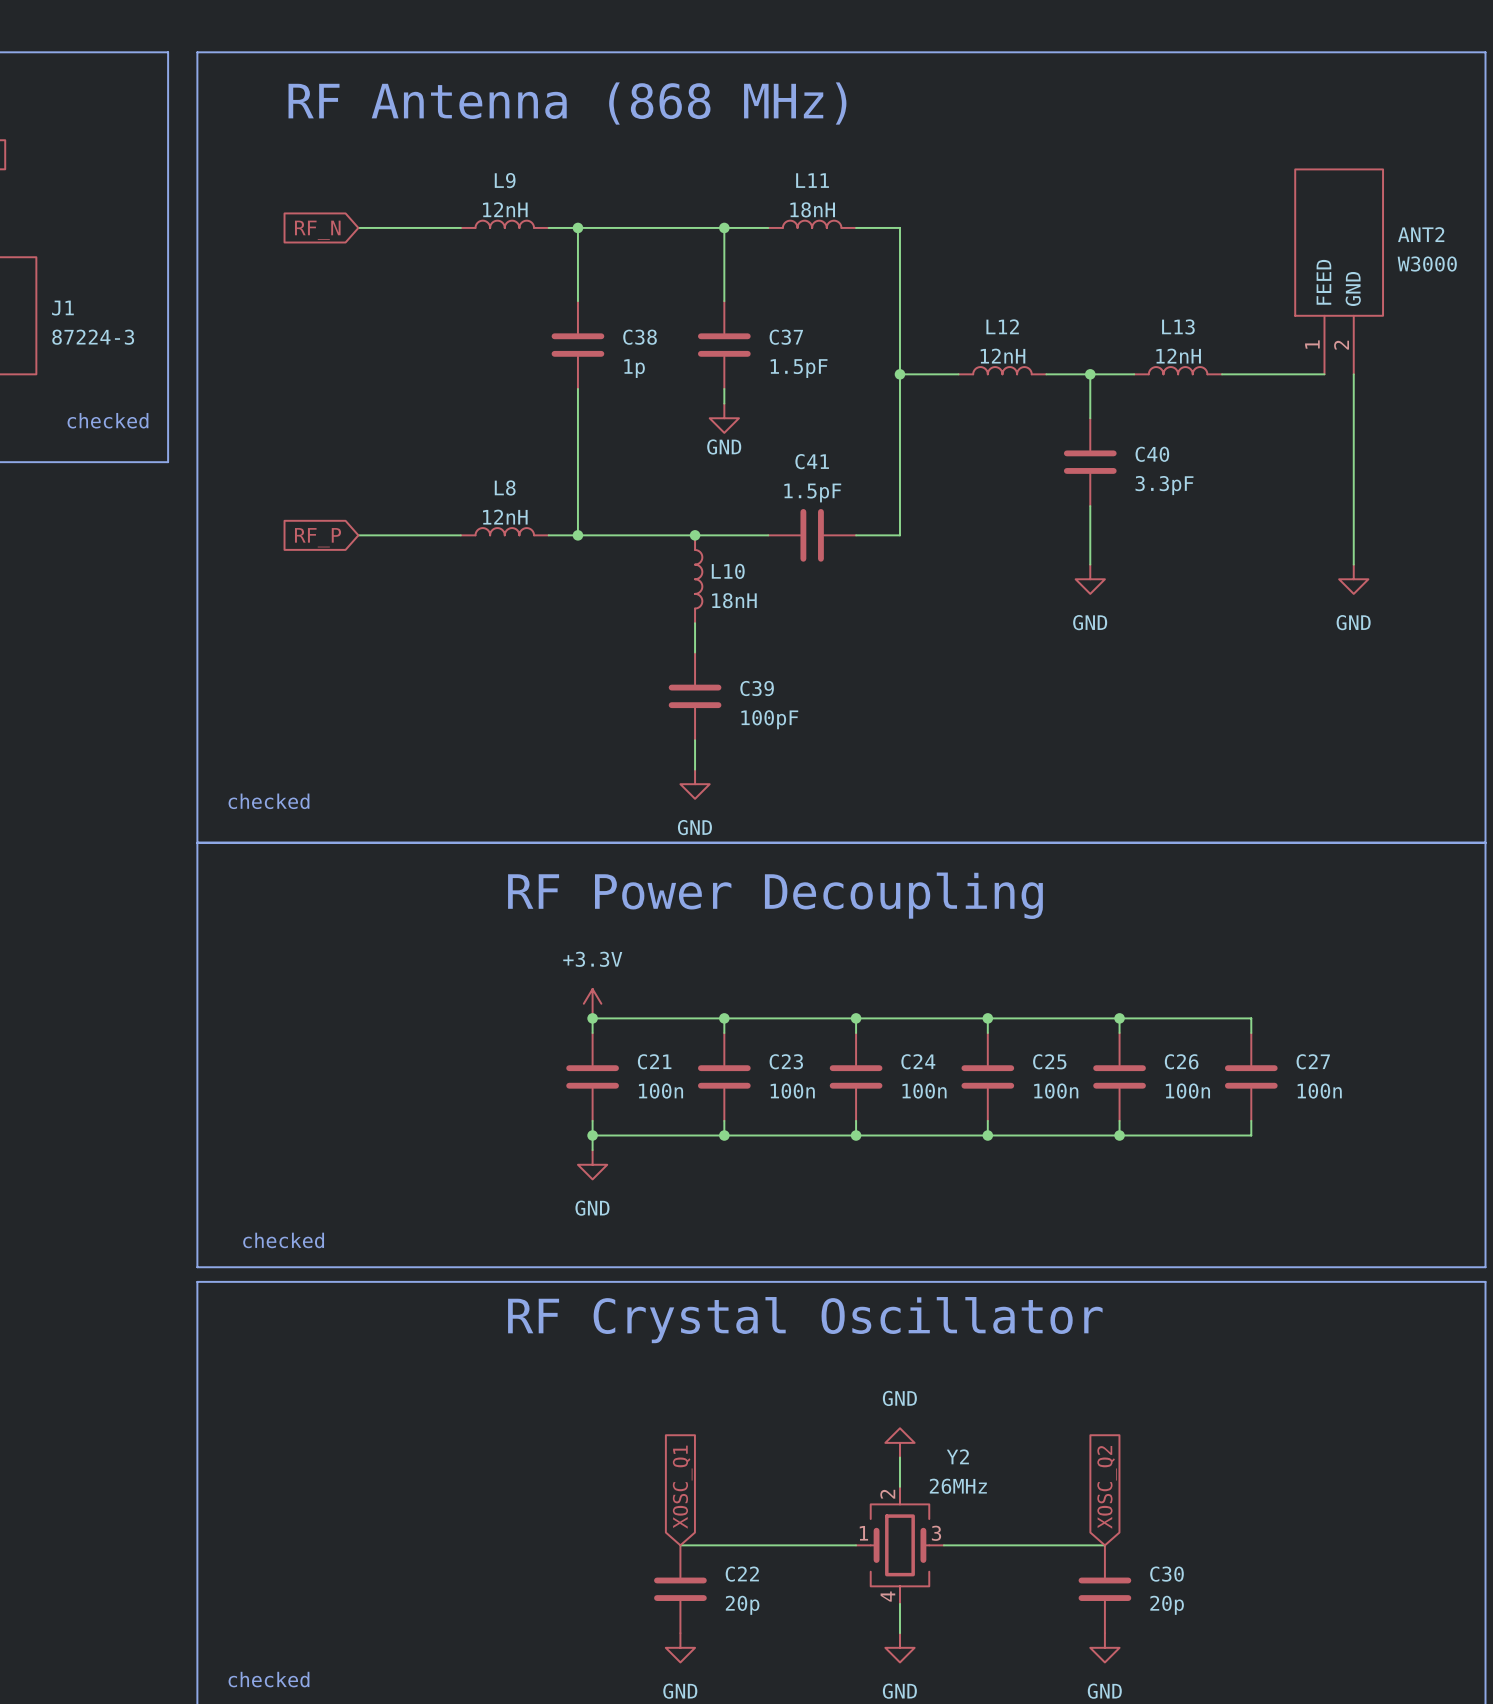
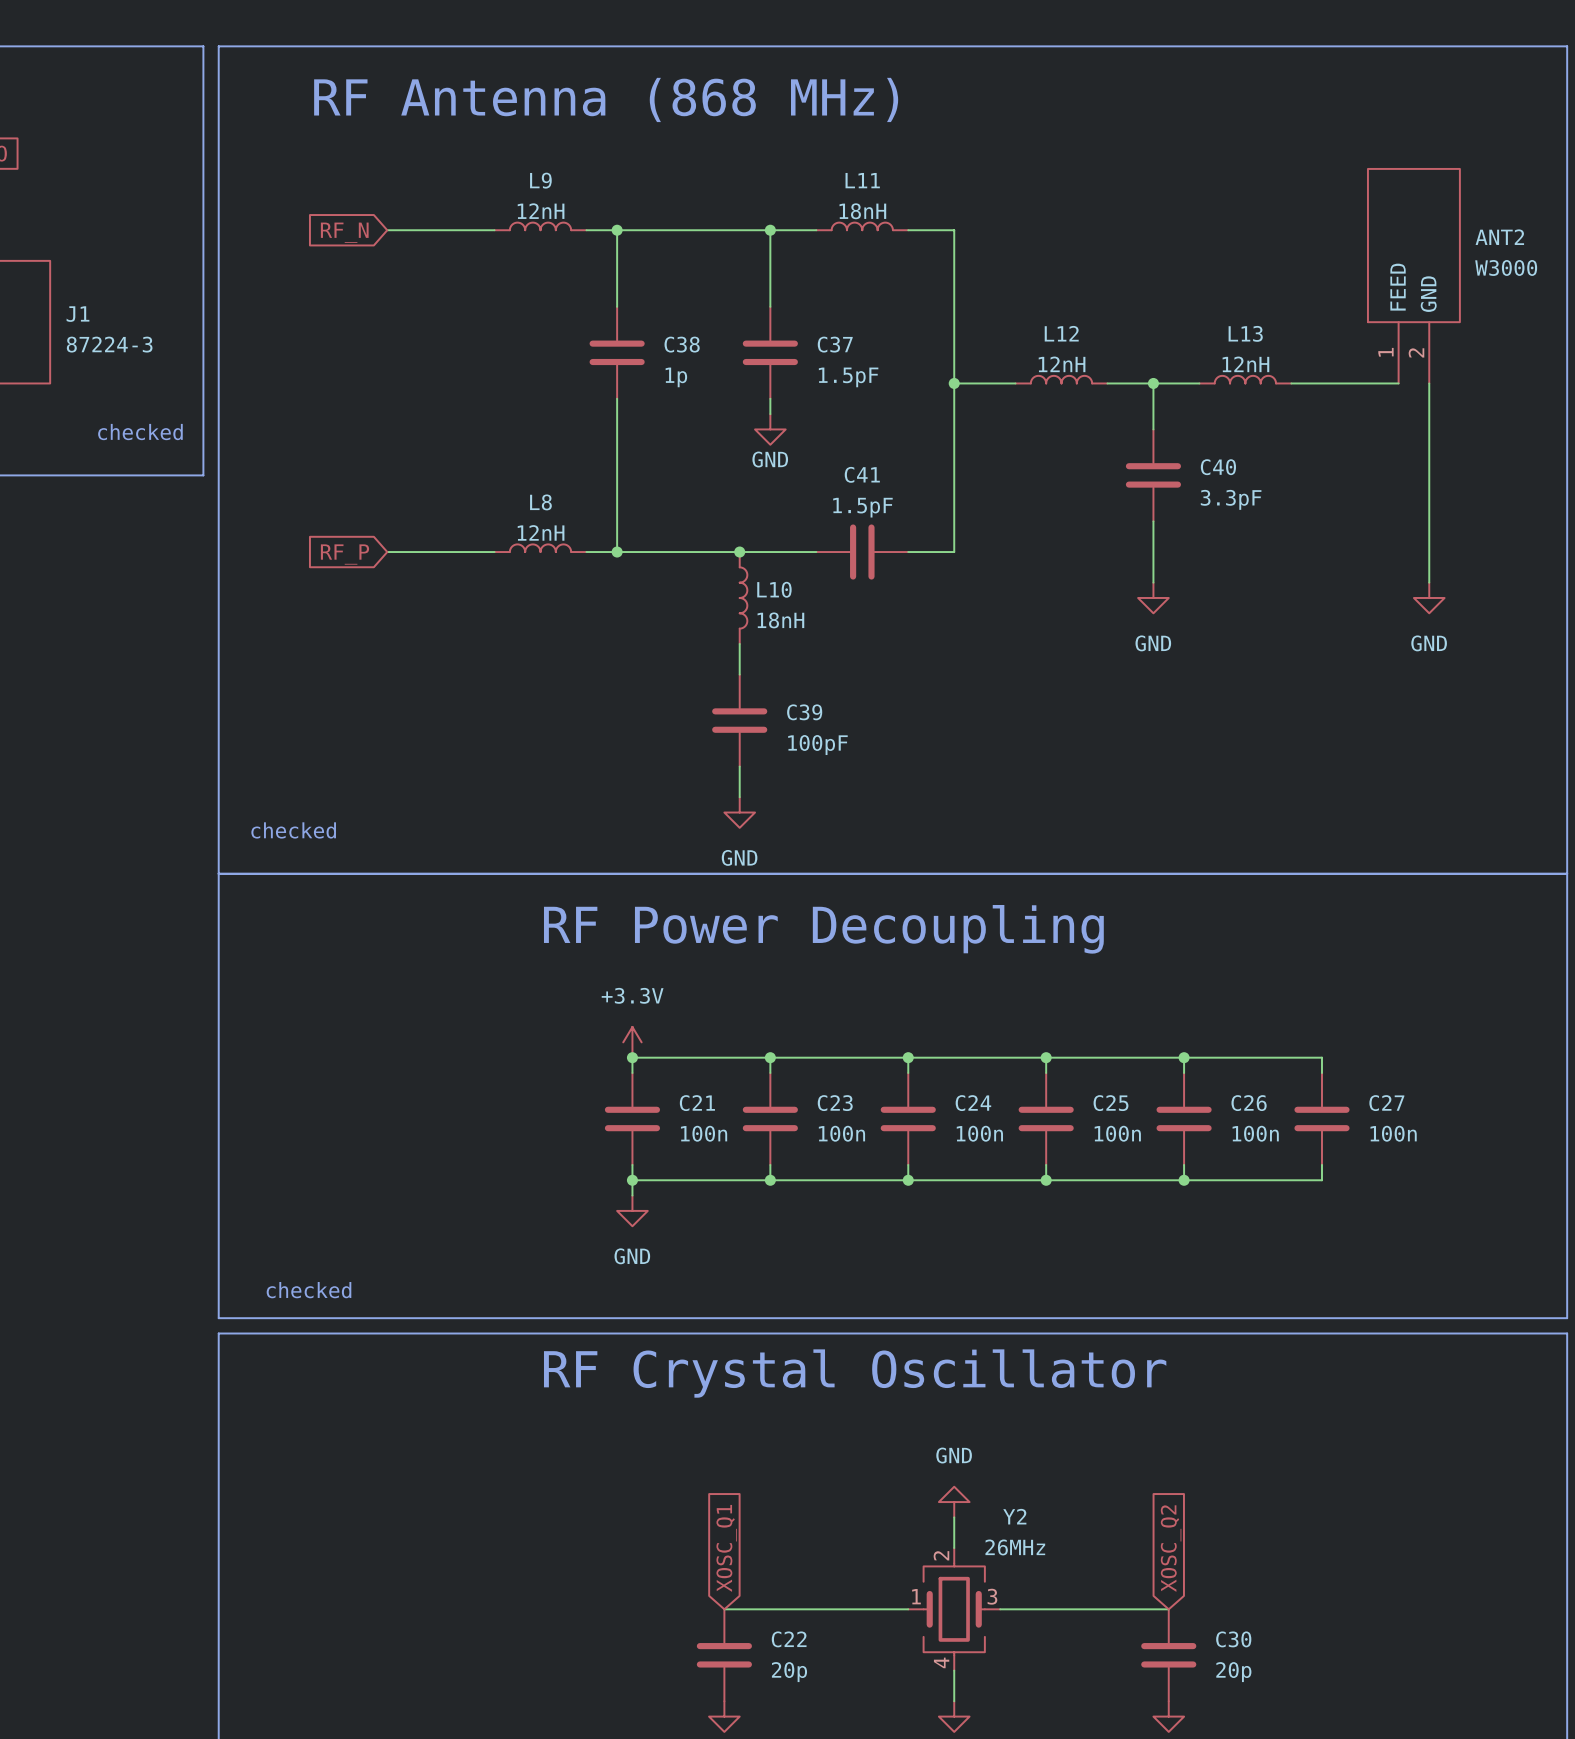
line: (168, 52) (168, 462) -> (188, 46) (203, 46) (203, 475) (188, 475)
text position: checked (107, 420) -> checked (140, 432)

